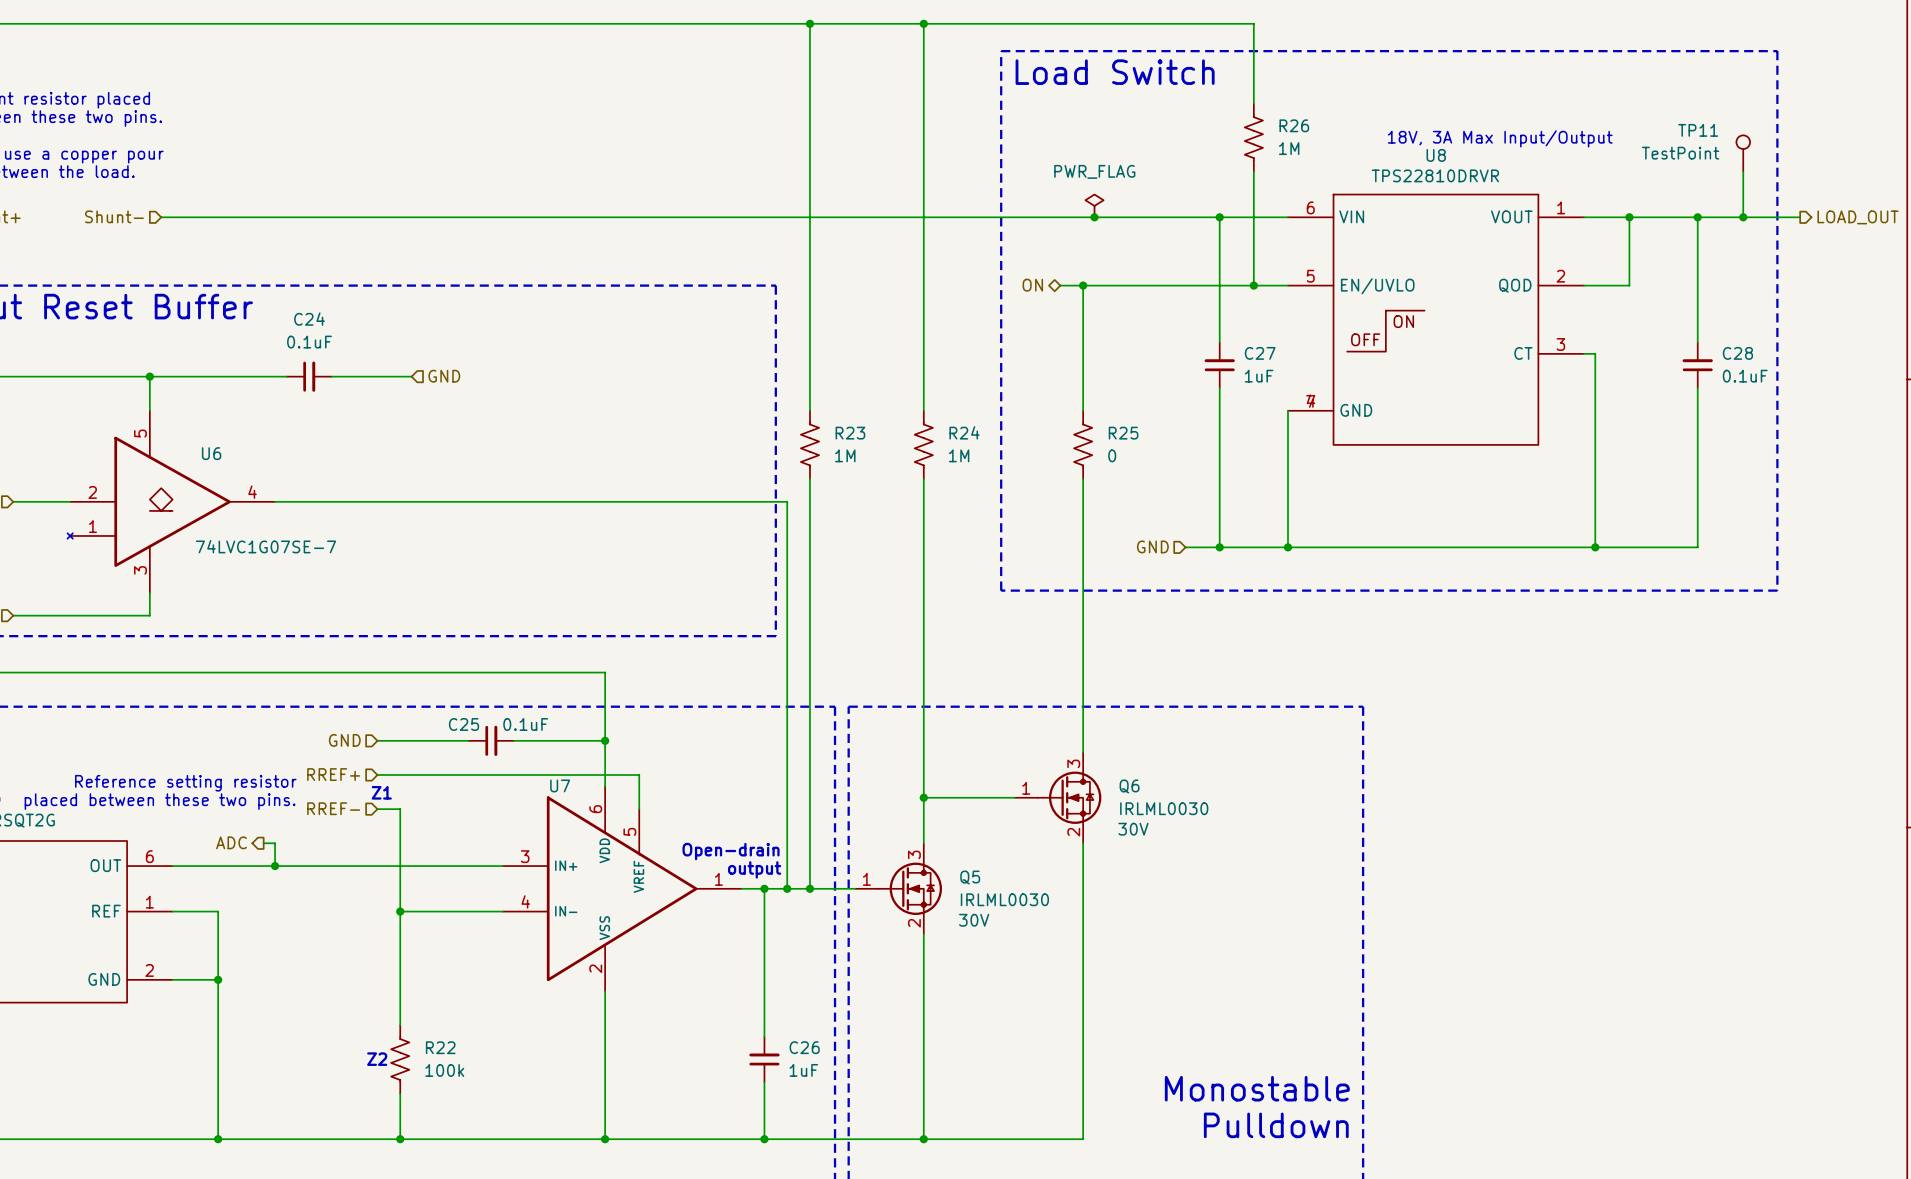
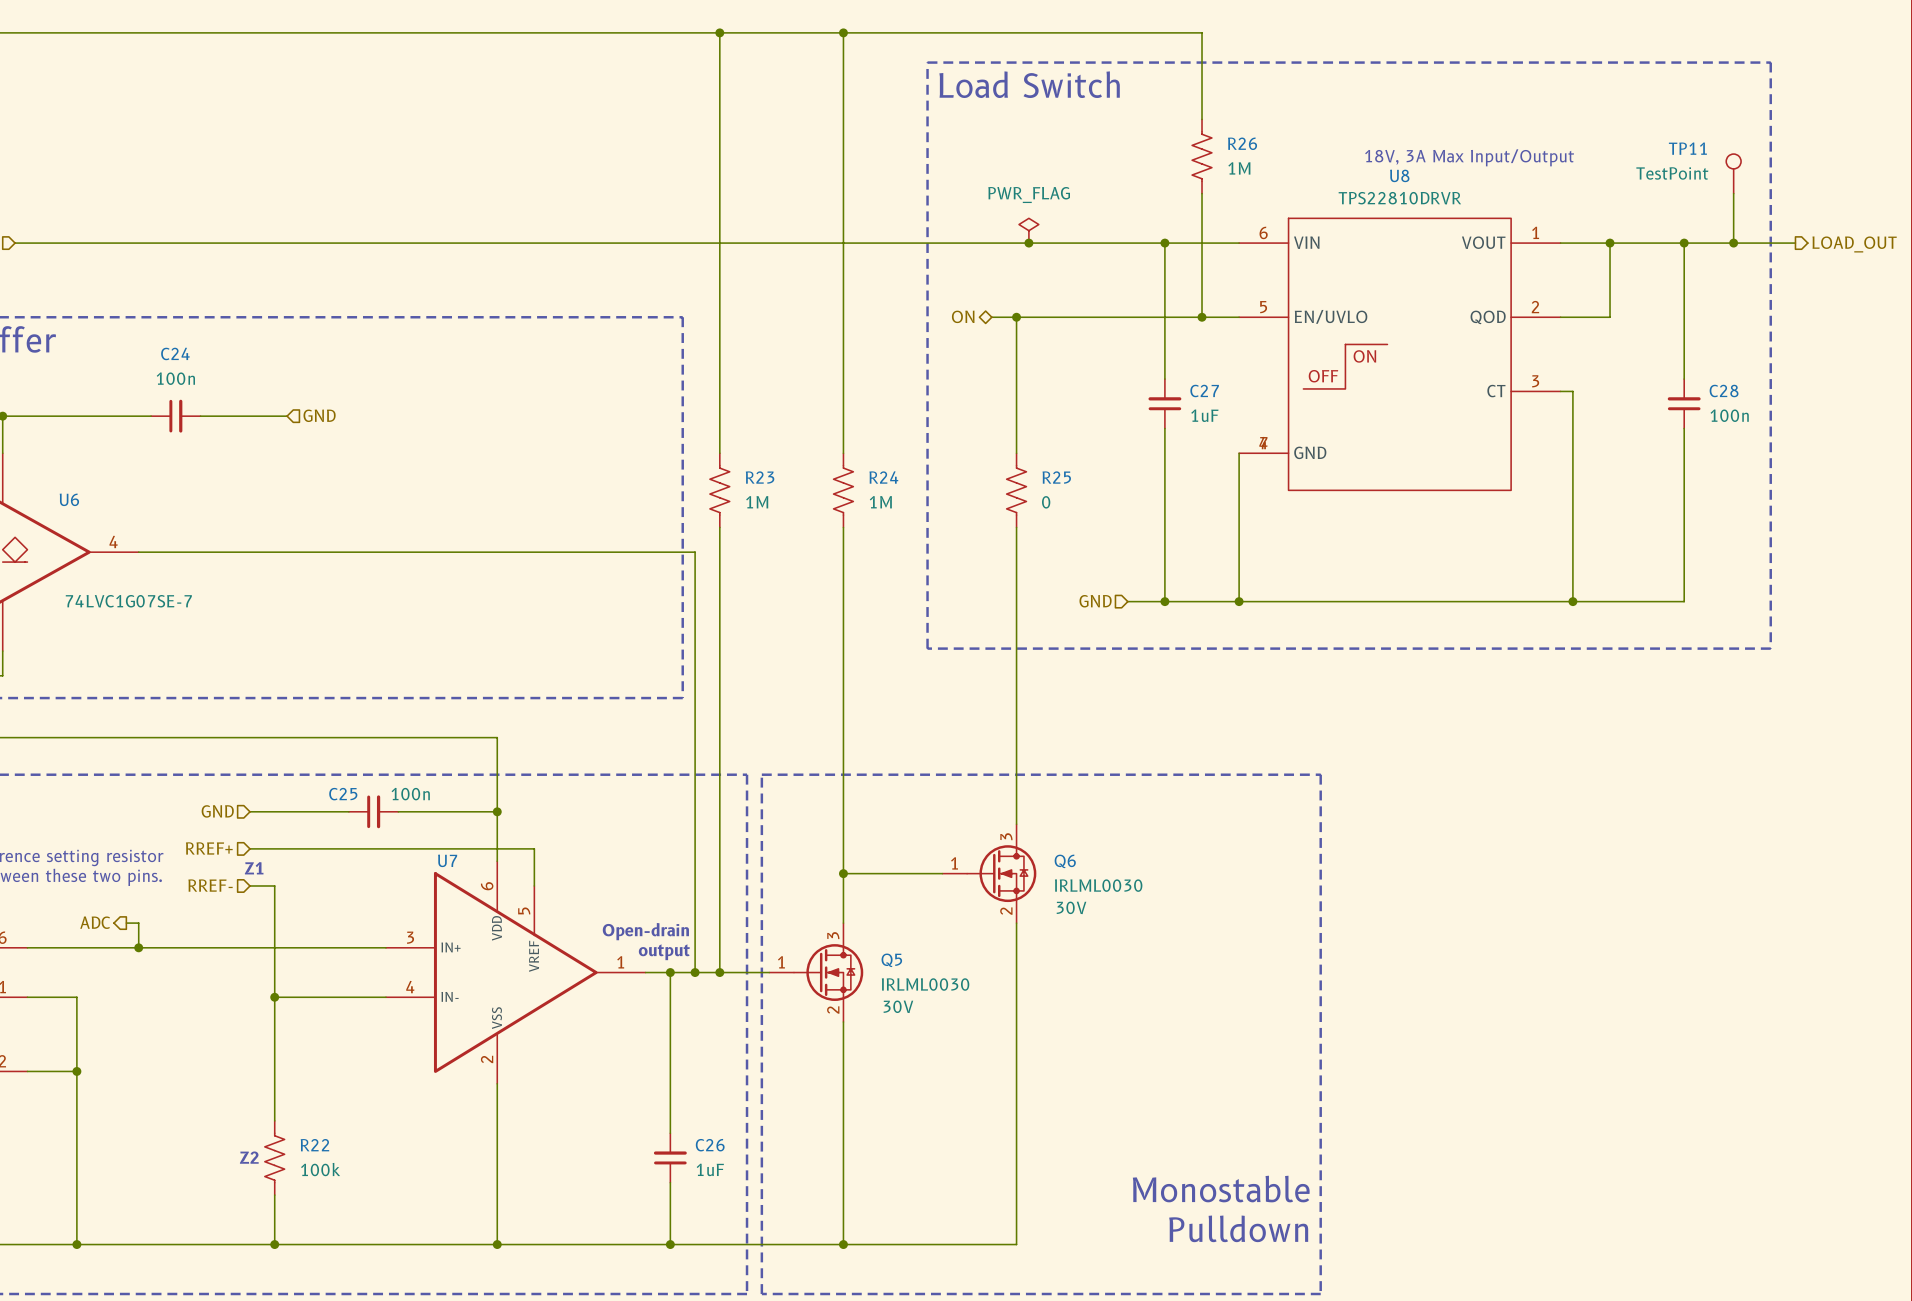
C24 value: 0.1uF (309, 342) -> 100n (175, 378)
C28 value: 0.1uF (1745, 376) -> 100n (1729, 415)
C25 value: 0.1uF (525, 724) -> 100n (410, 794)

